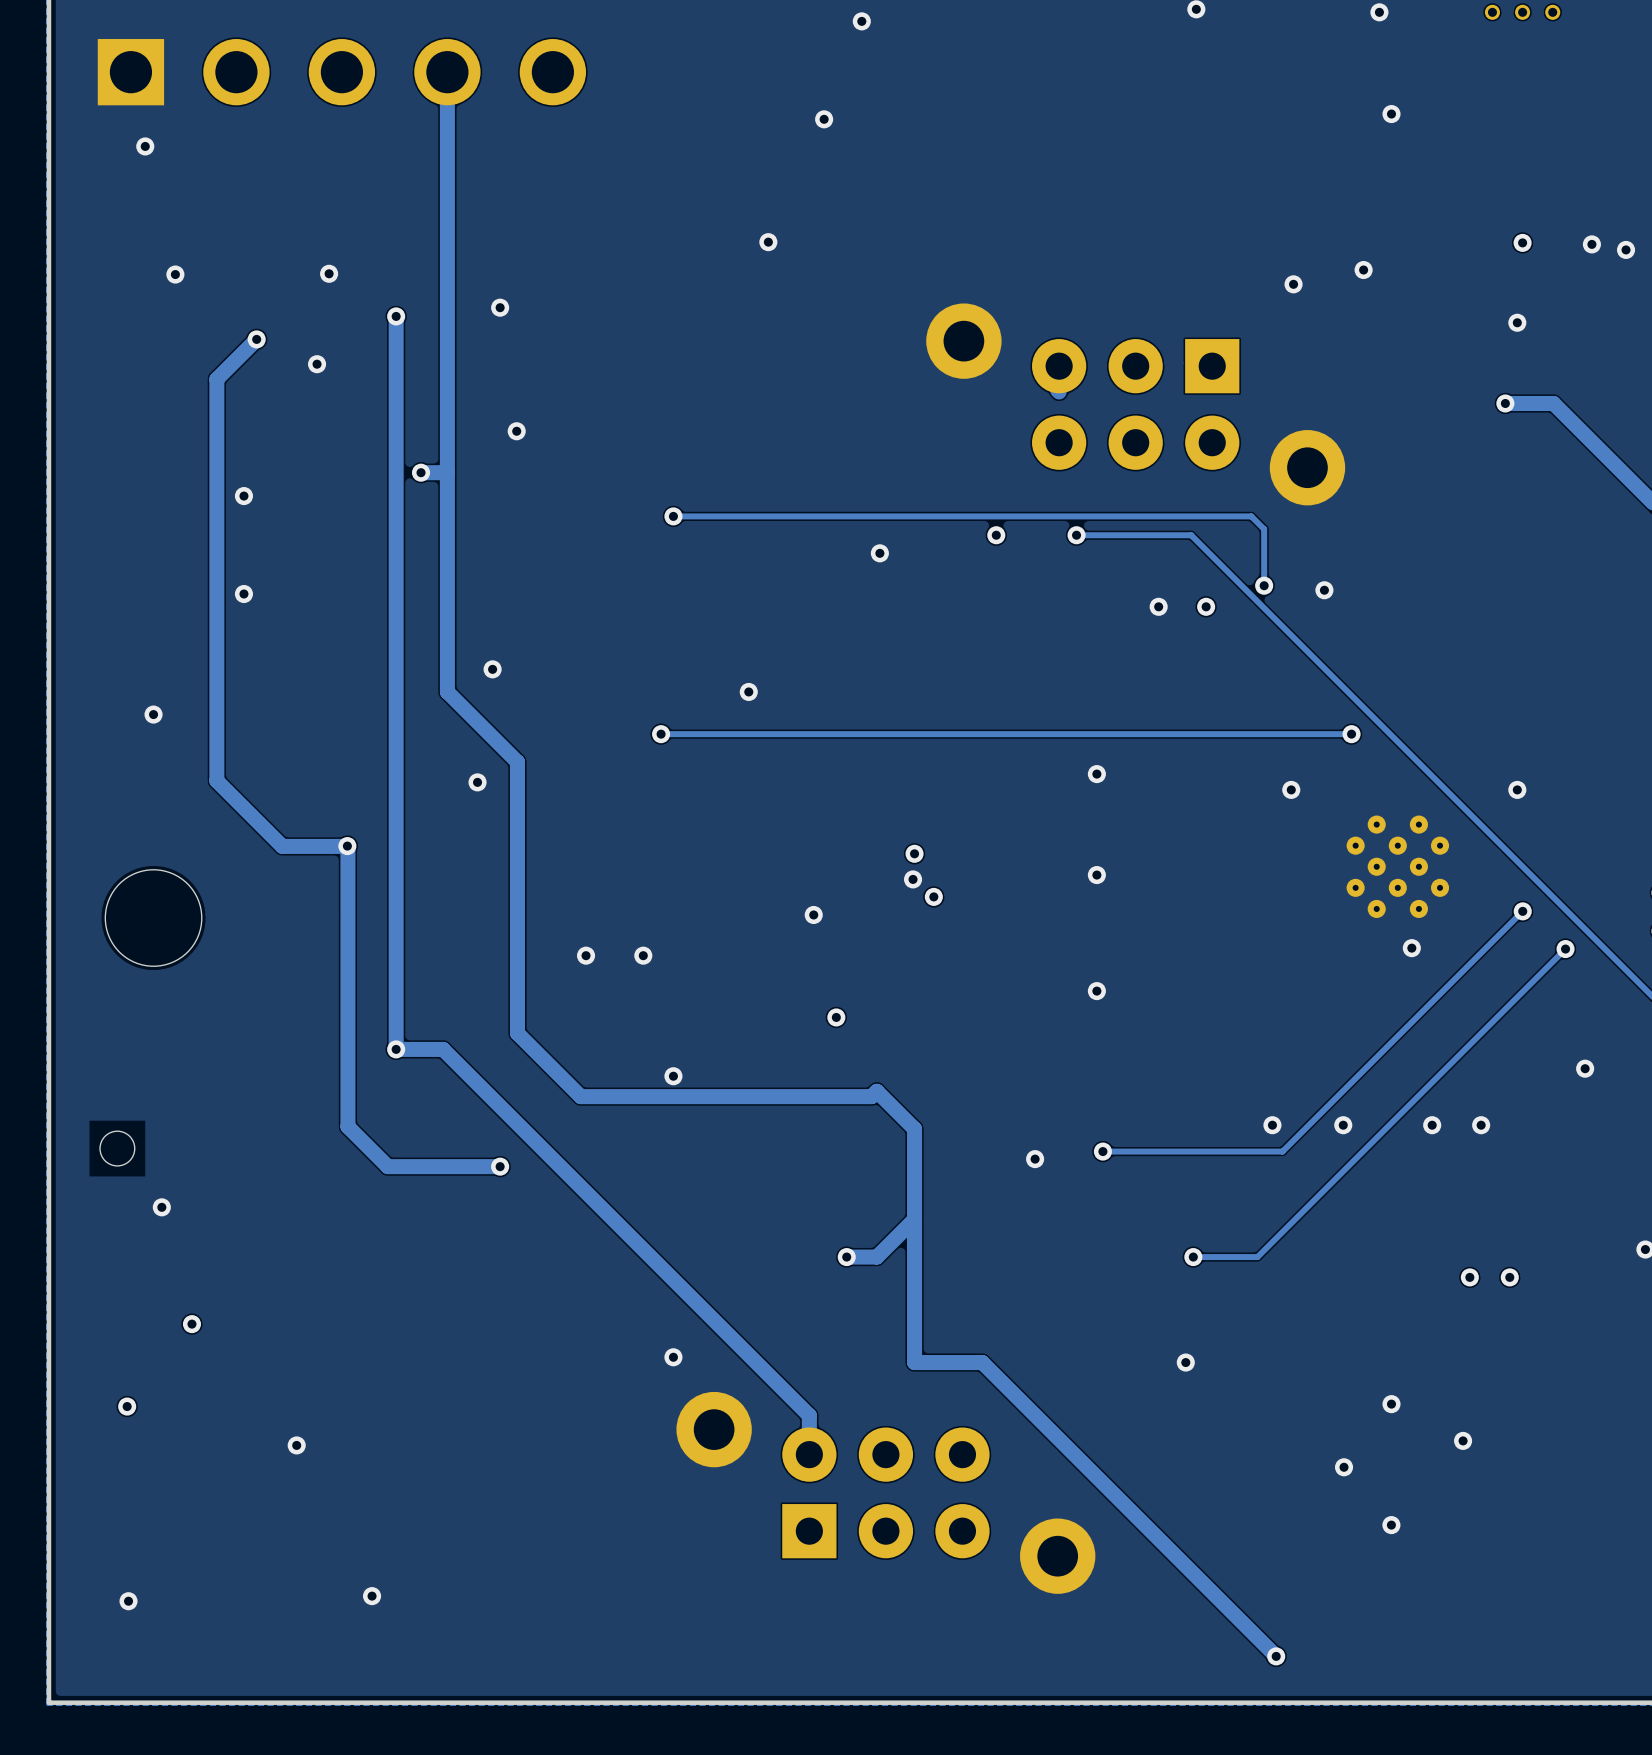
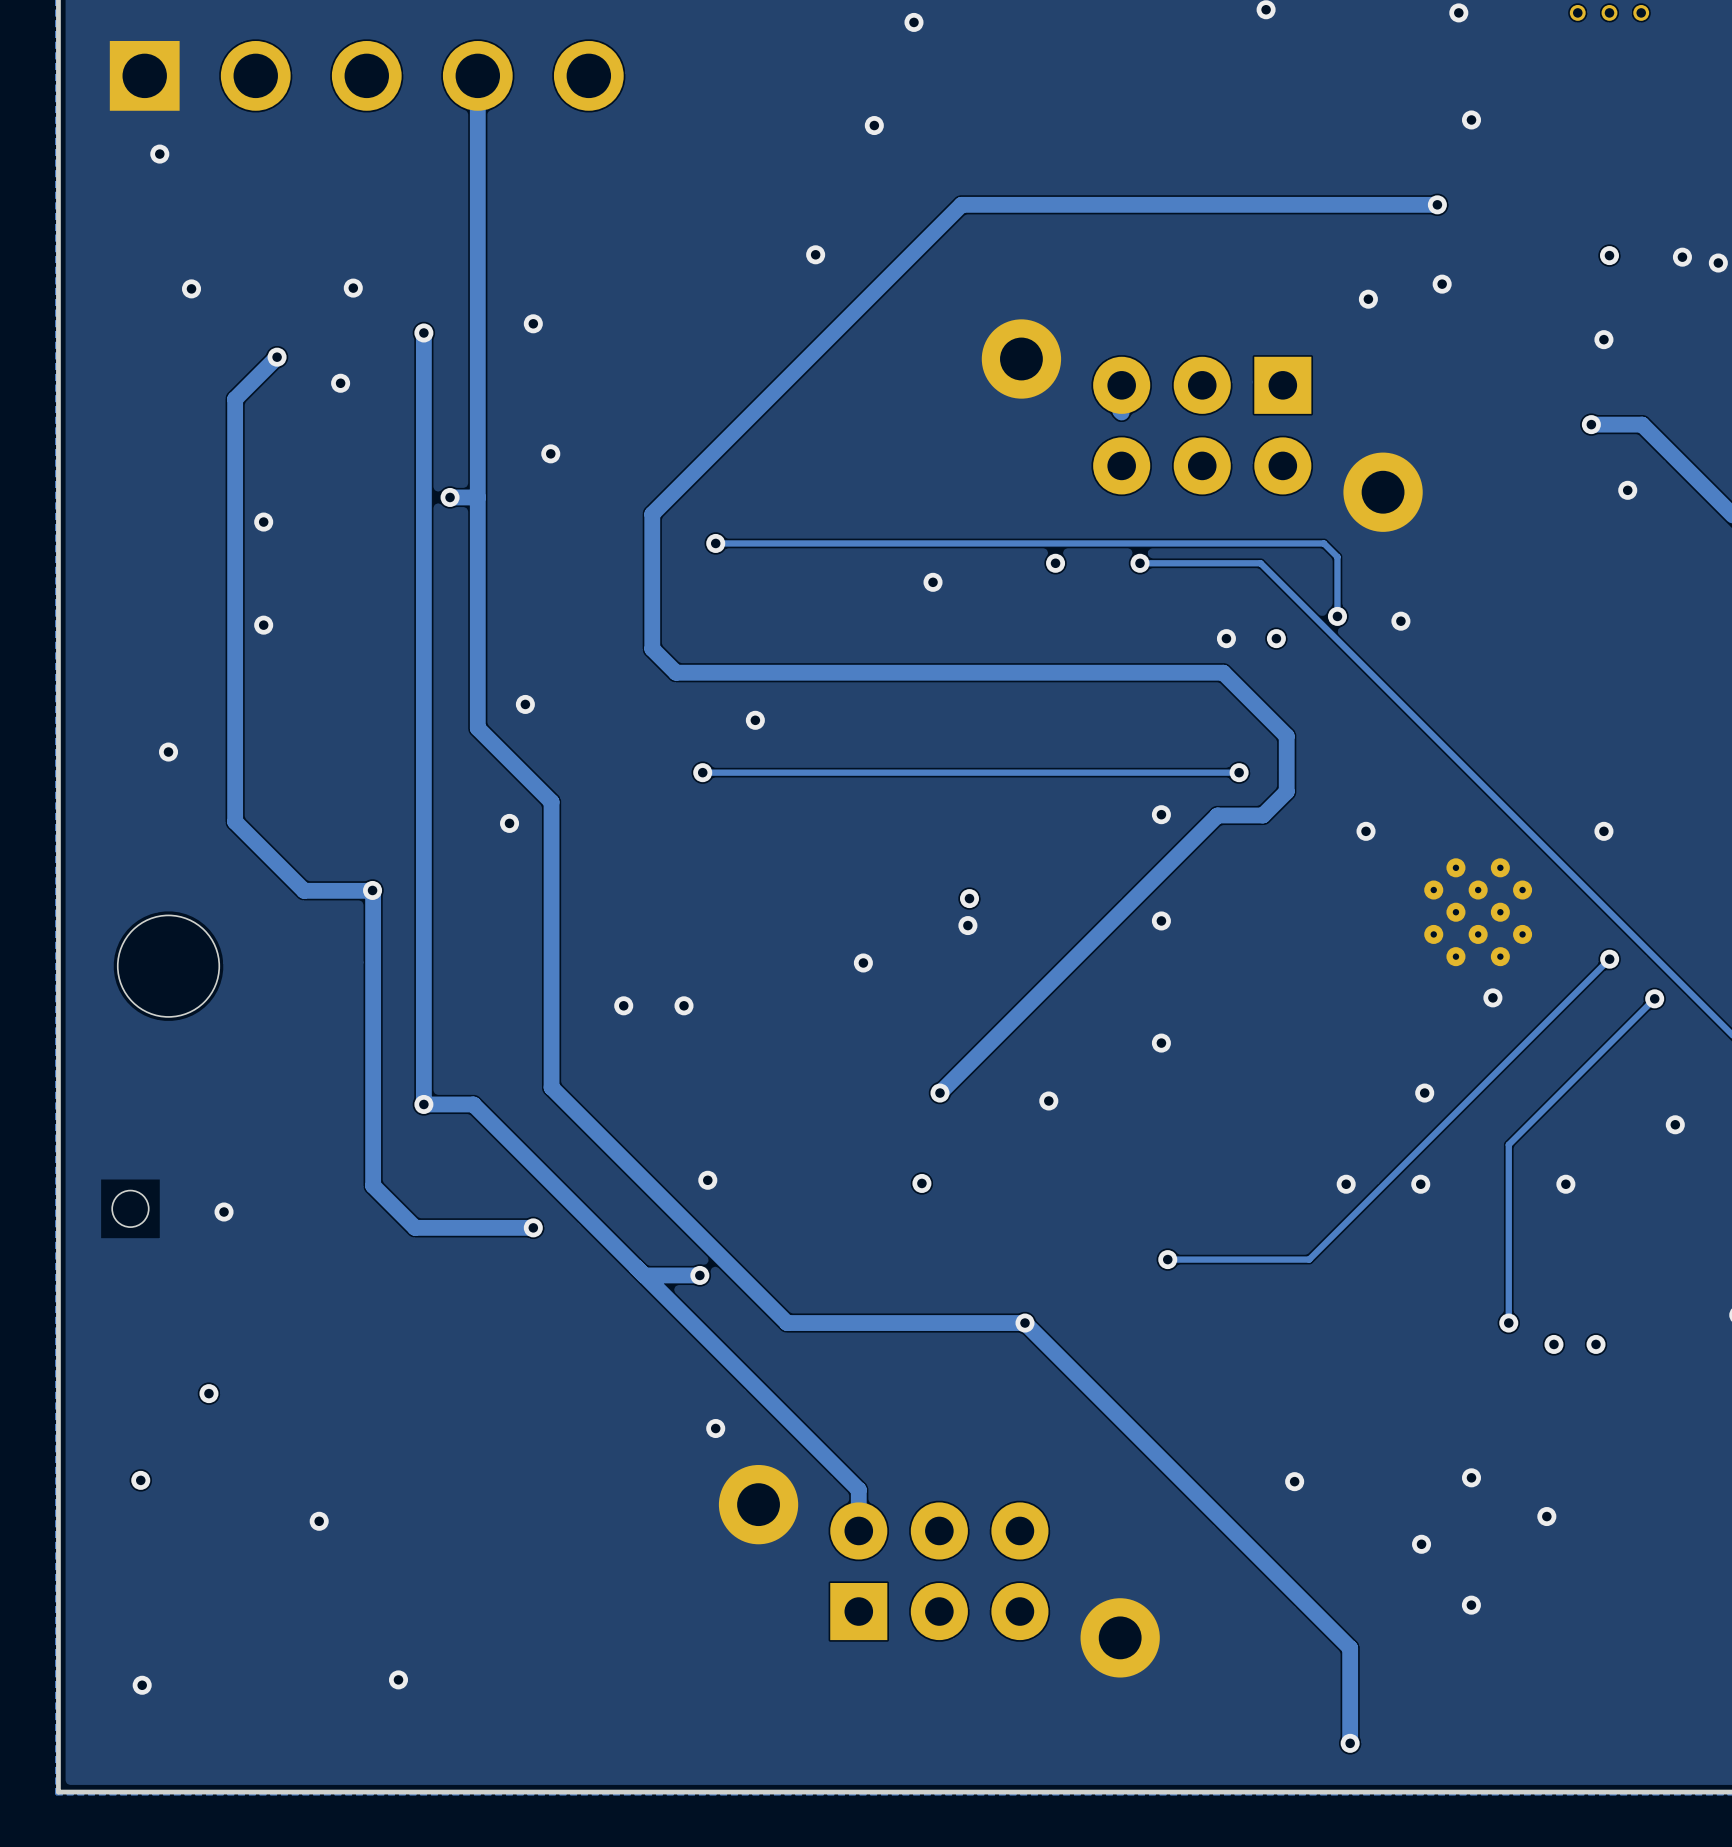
track: none -> (1437, 204) (961, 204) (652, 514) (652, 648) (676, 672) (1223, 672) (1286, 736) (1286, 791) (1262, 815) (1217, 815) (939, 1093)
via: none -> (1437, 204)
via: none -> (1627, 490)
via position: (748, 691) -> (755, 720)
via: none -> (1239, 772)
via: (1351, 734) -> none
track: (1354, 734) (1170, 734) -> none
via: (933, 896) -> none
via position: (836, 1017) -> (939, 1093)
via: none -> (1424, 1093)
via: none -> (1048, 1100)
via position: (673, 1076) -> (707, 1180)
track: (1426, 1087) (1257, 1257) (1193, 1257) -> (1508, 1144) (1508, 1323)
track: (580, 1096) (871, 1096) (876, 1091) (914, 1128) (914, 1362) (982, 1362) (1276, 1656) -> (929, 1323) (1025, 1323) (1350, 1648) (1350, 1743)
track: none -> (618, 1154) (787, 1323) (898, 1323)
via: none -> (921, 1183)
via: (1432, 1125) -> none
via: (1102, 1151) -> none
track: (1282, 1151) (1102, 1151) -> (1356, 1212) (1309, 1259) (1167, 1259)
via: (1035, 1159) -> none
via: none -> (1167, 1259)
via position: (161, 1207) -> (224, 1212)
track: none -> (699, 1275) (644, 1275)
via: none -> (699, 1275)
track: (914, 1219) (876, 1257) -> none
via: (846, 1257) -> none
via: none -> (1025, 1323)
via: (1193, 1257) -> none
via: none -> (1508, 1323)
via position: (1185, 1362) -> (1294, 1481)

